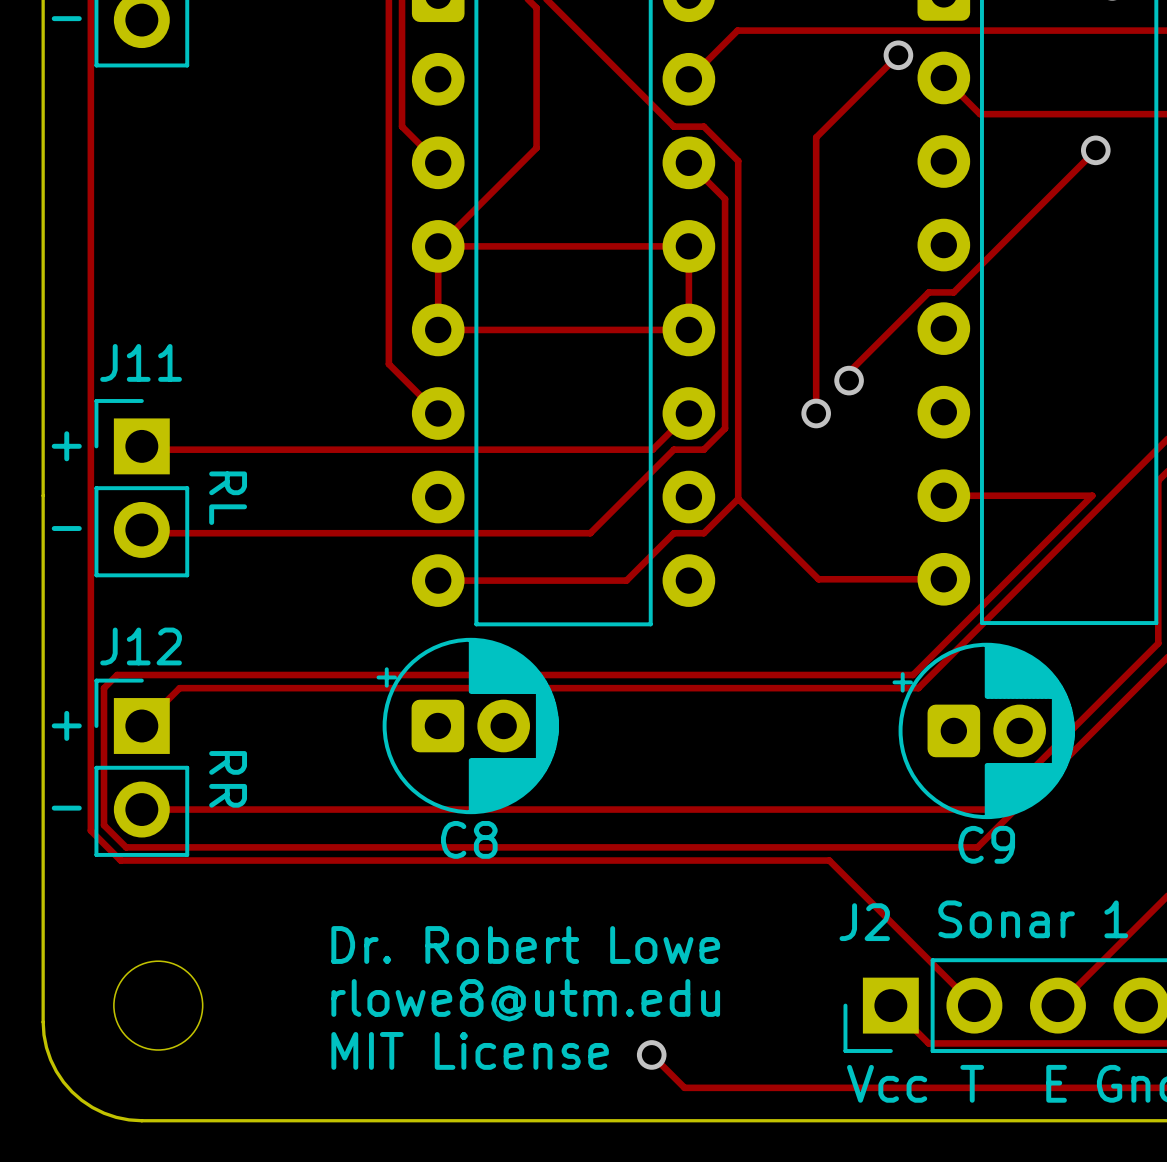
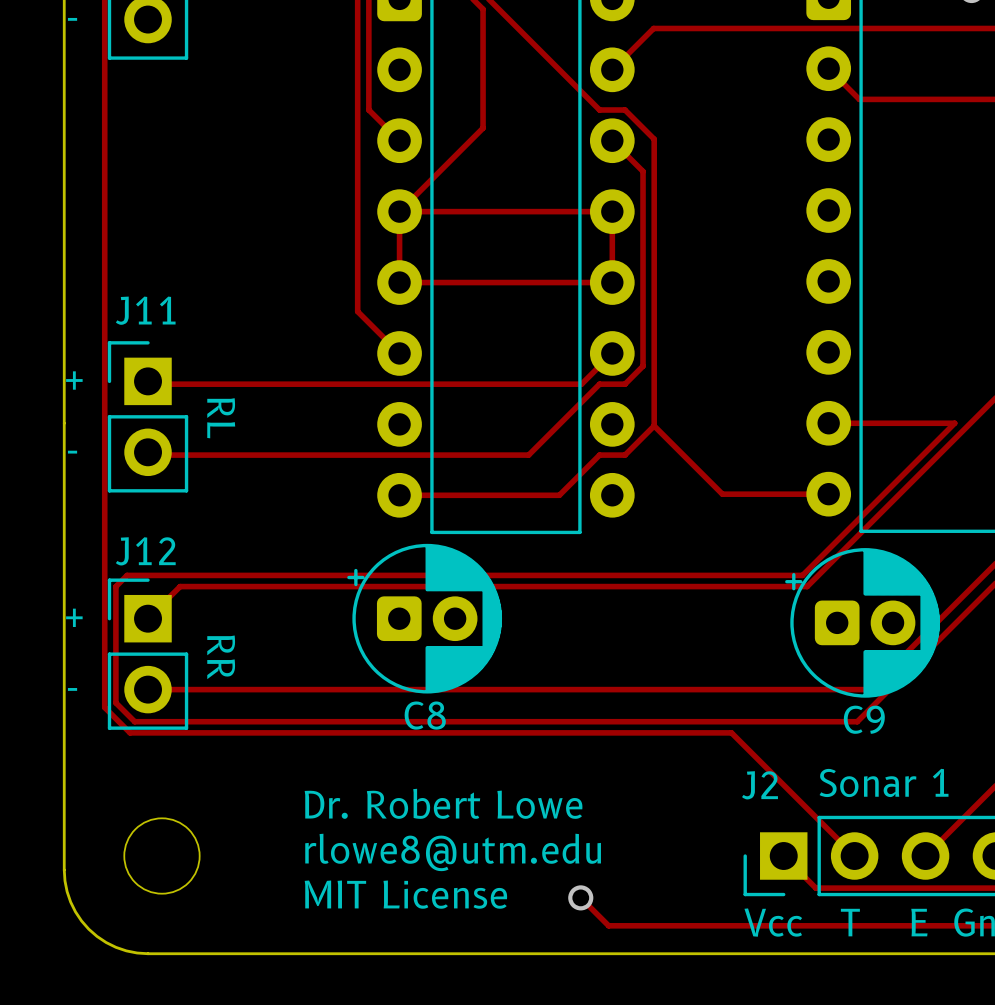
track: (898, 55) (816, 137) (816, 413) -> none
via: (898, 55) -> none
track: (1095, 150) (953, 292) (928, 292) (849, 372) (849, 380) -> none
via: (1095, 150) -> none
via: (849, 380) -> none
via: (816, 413) -> none

